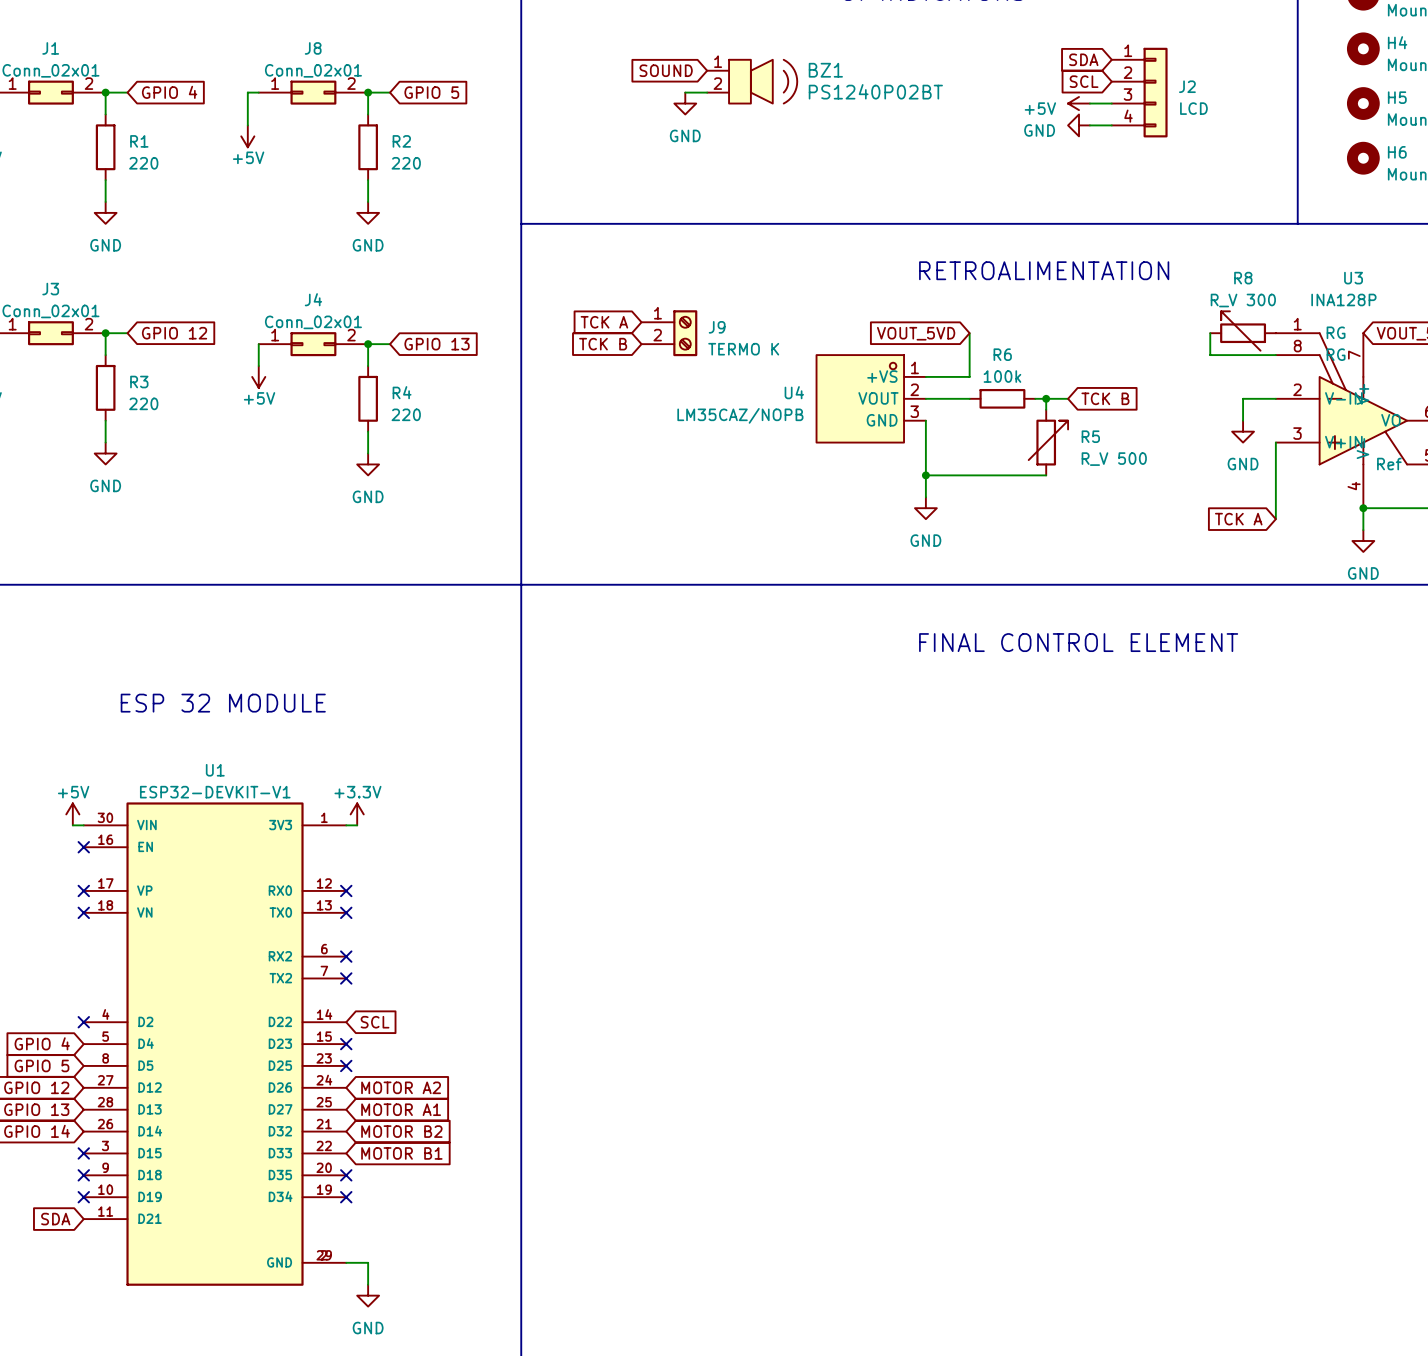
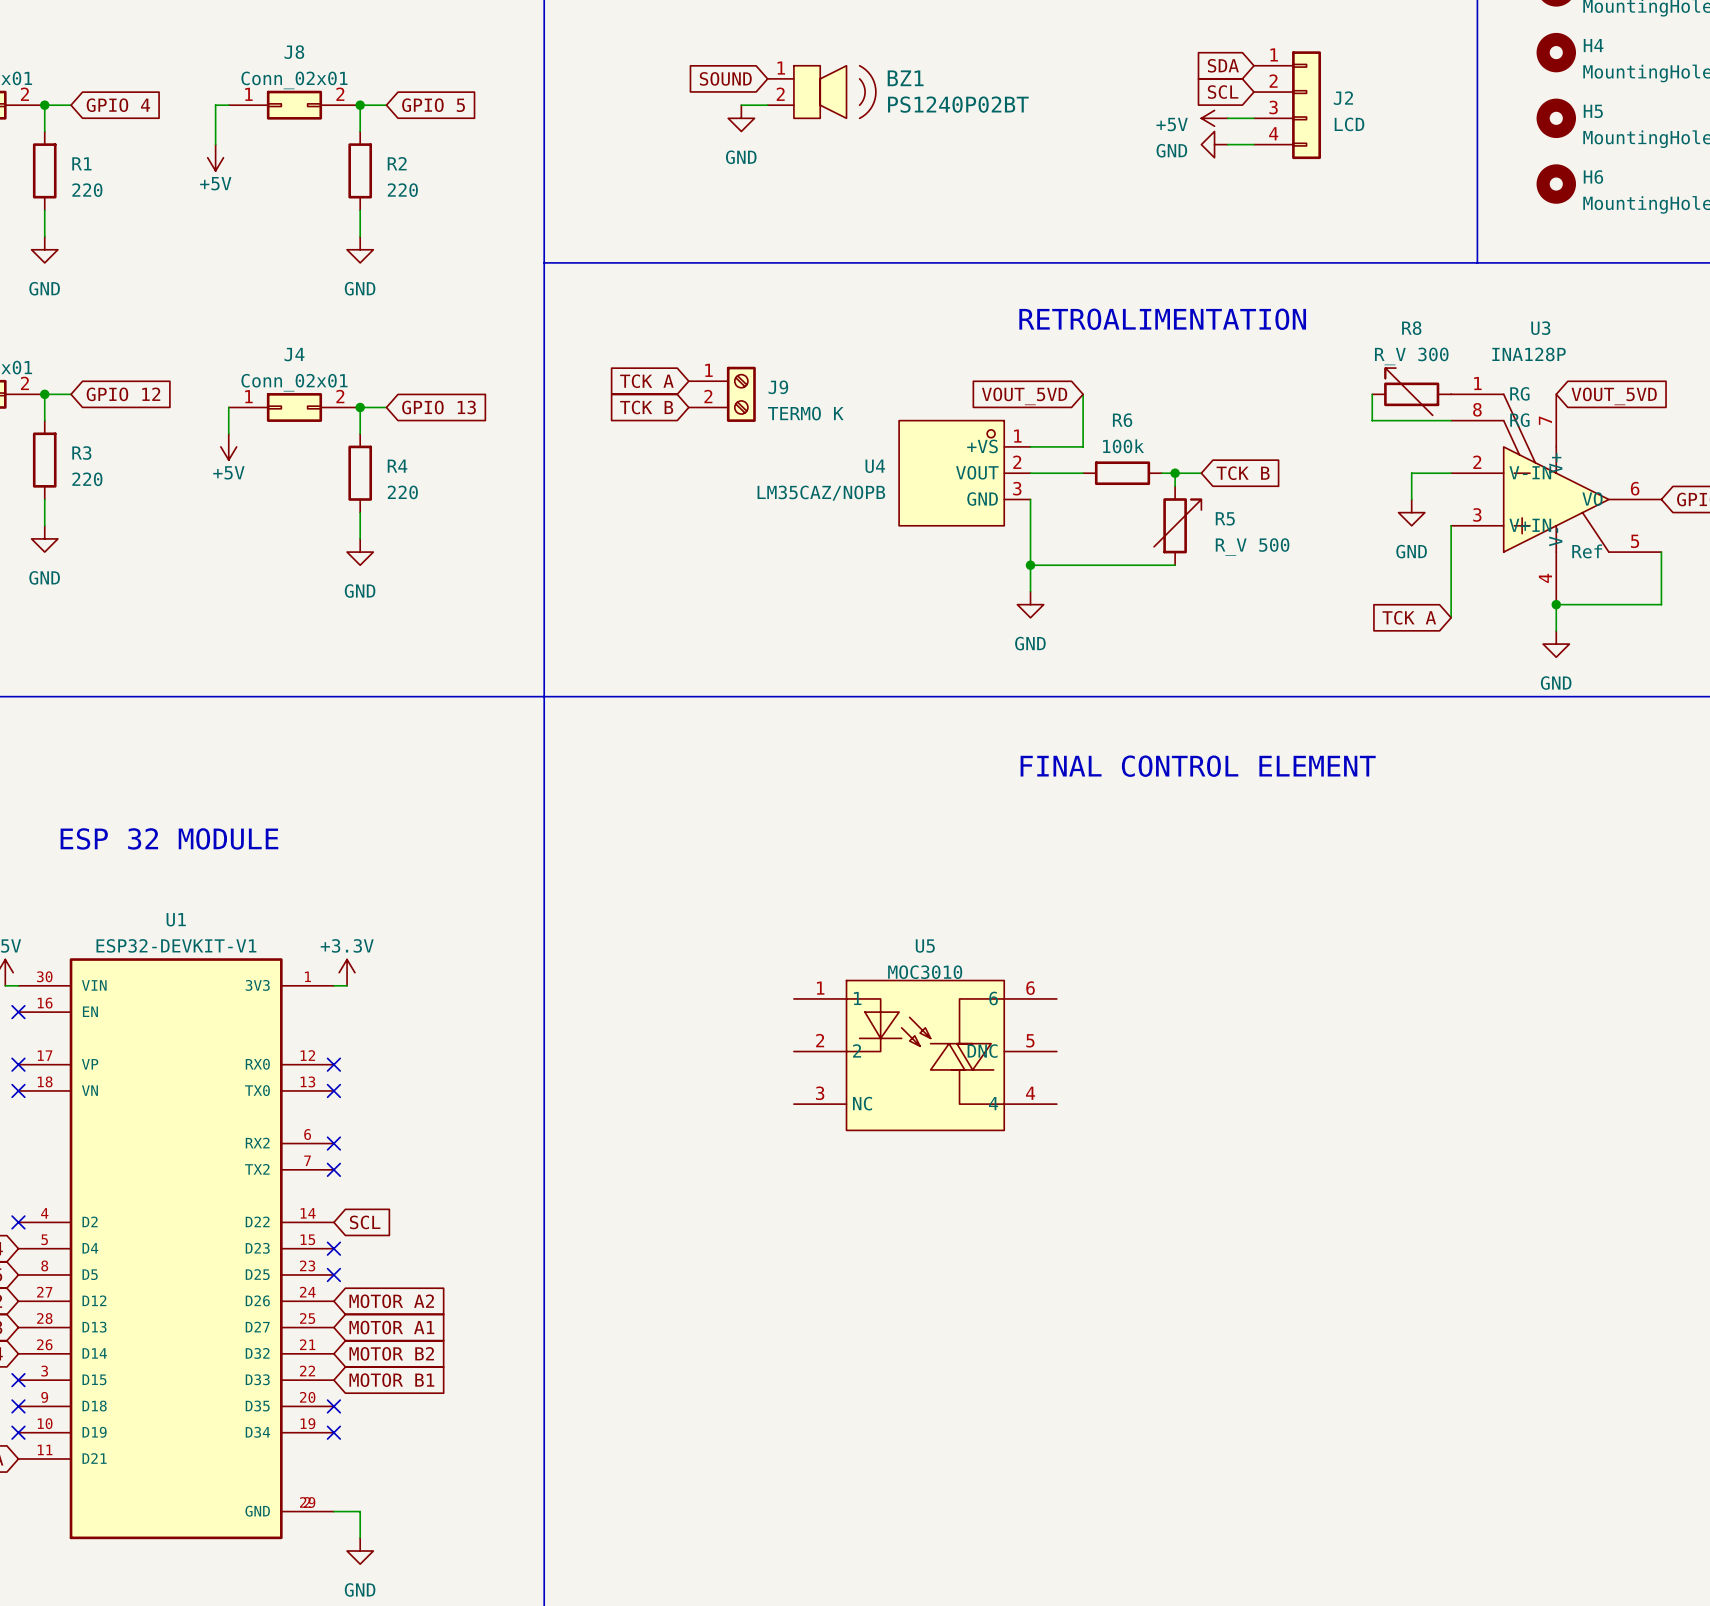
U5: none -> MOC3010 (925, 1055)

